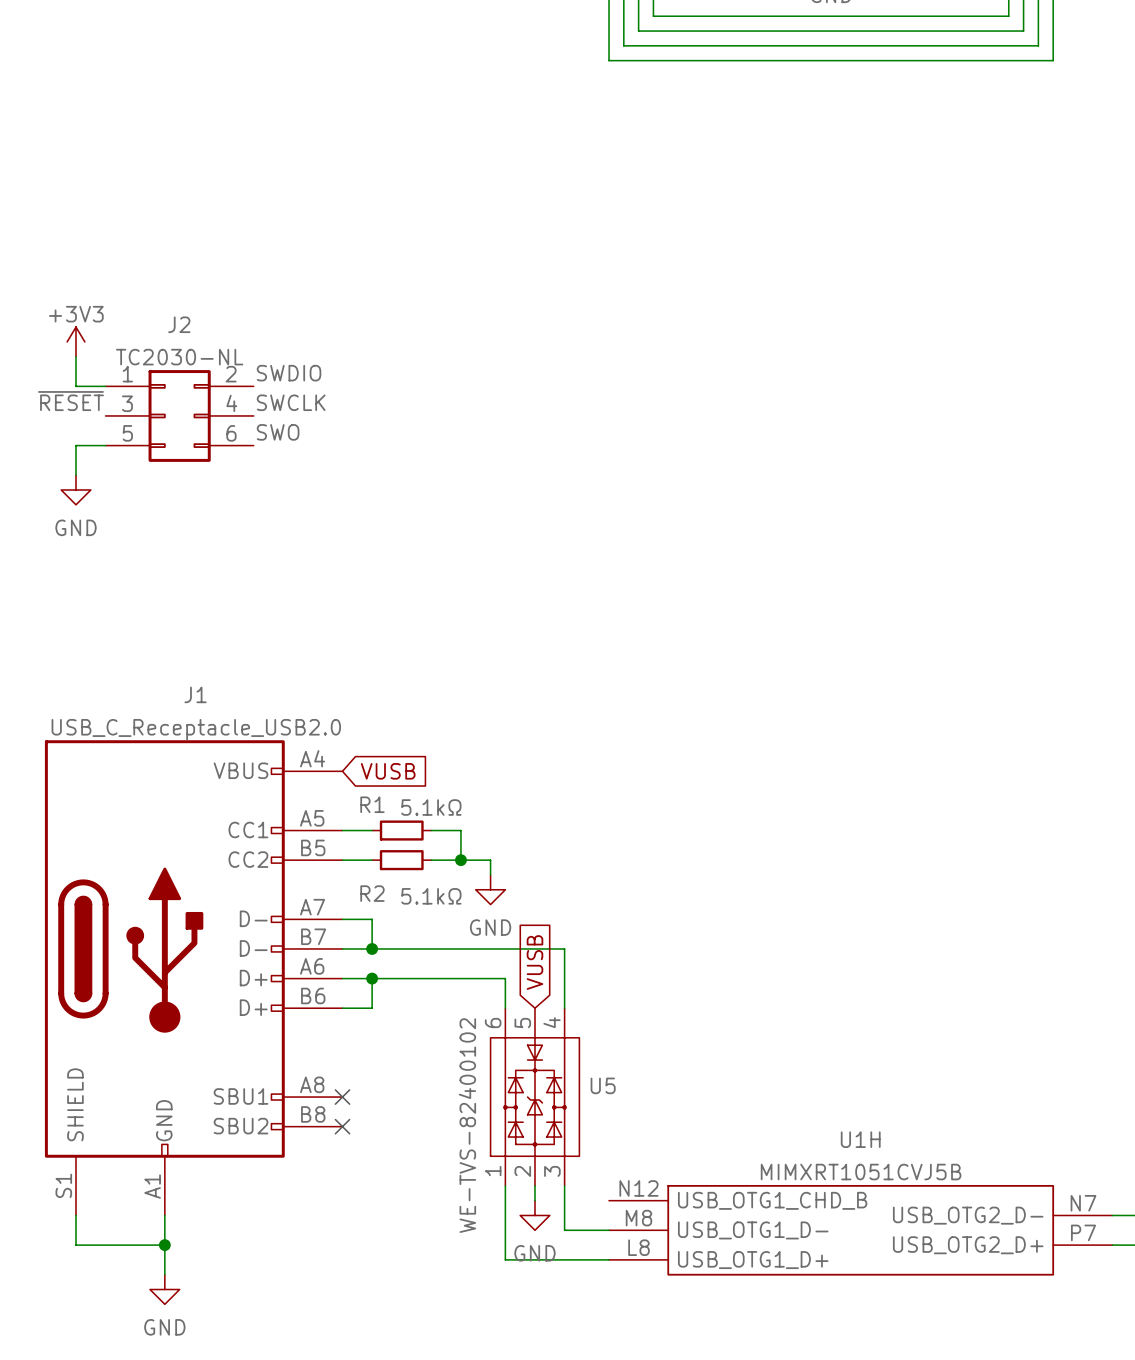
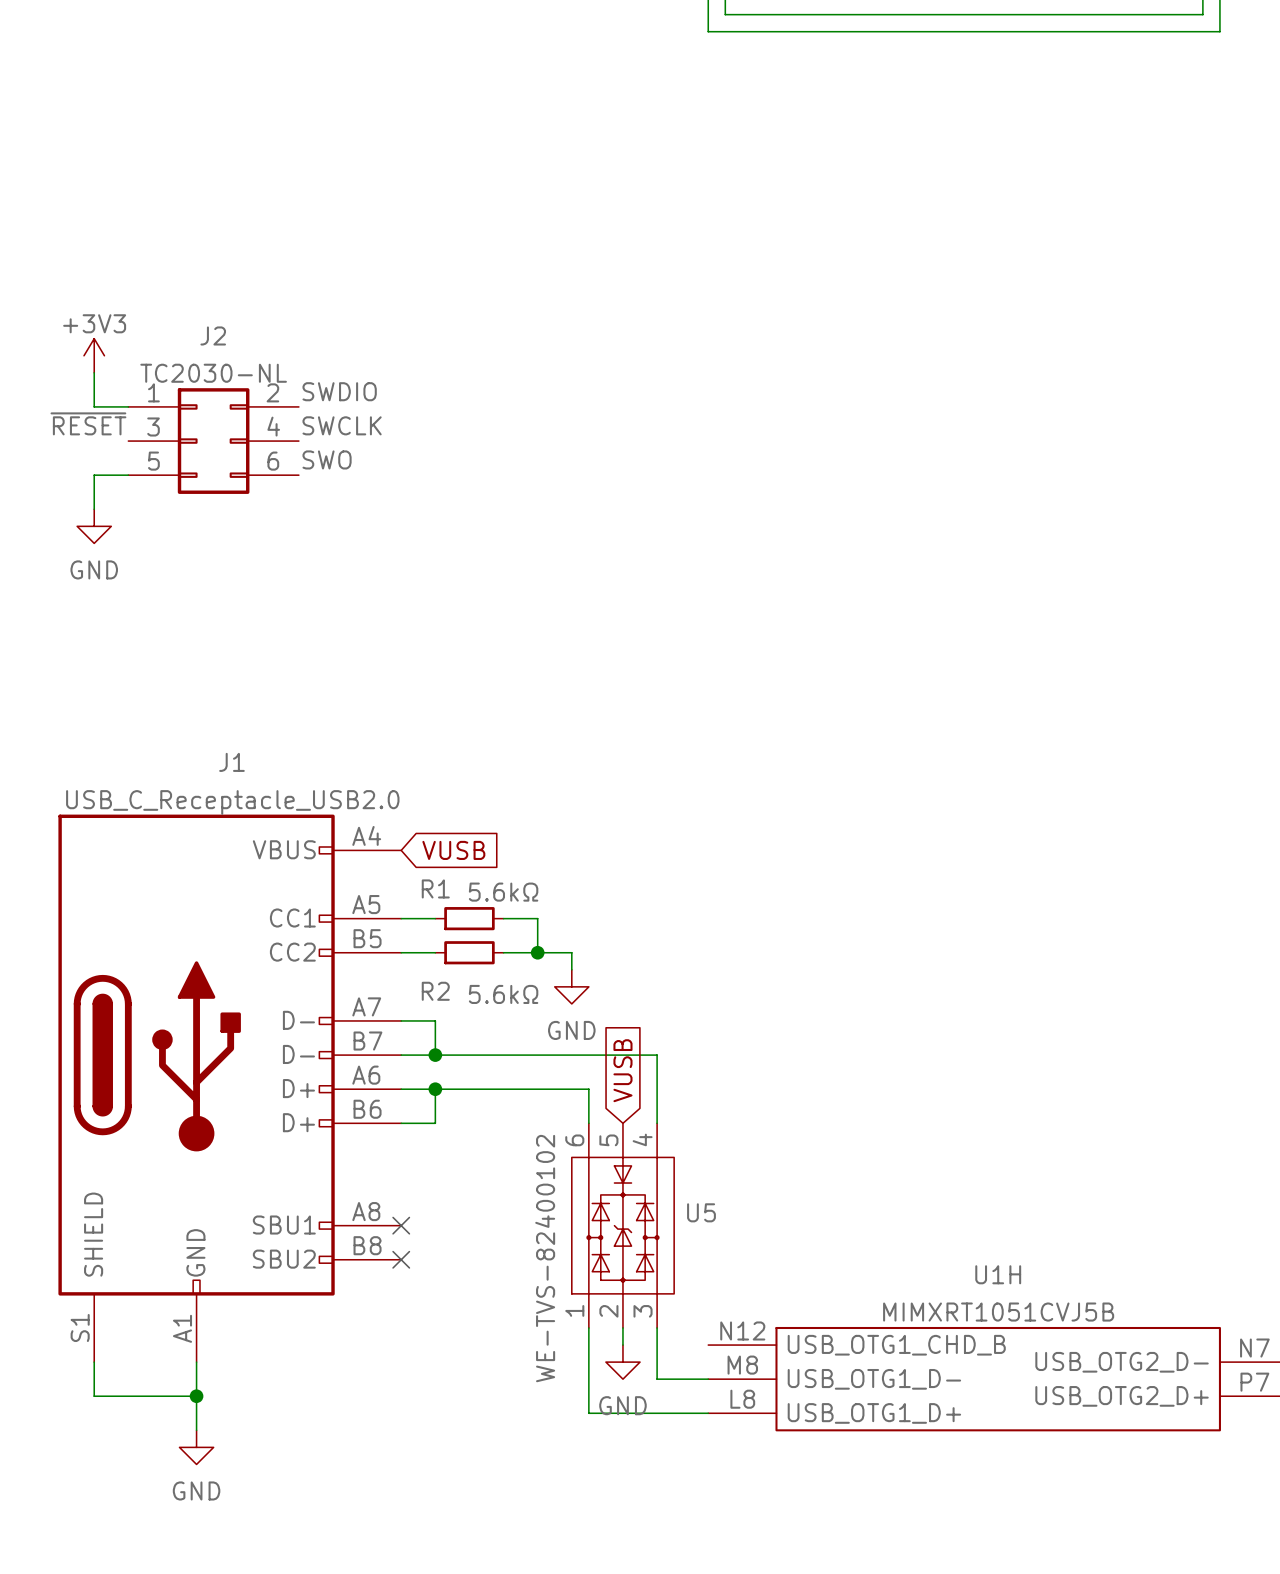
R1 value: 5.1kΩ (431, 807) -> 5.6kΩ (503, 892)
R2 value: 5.1kΩ (431, 896) -> 5.6kΩ (503, 994)

